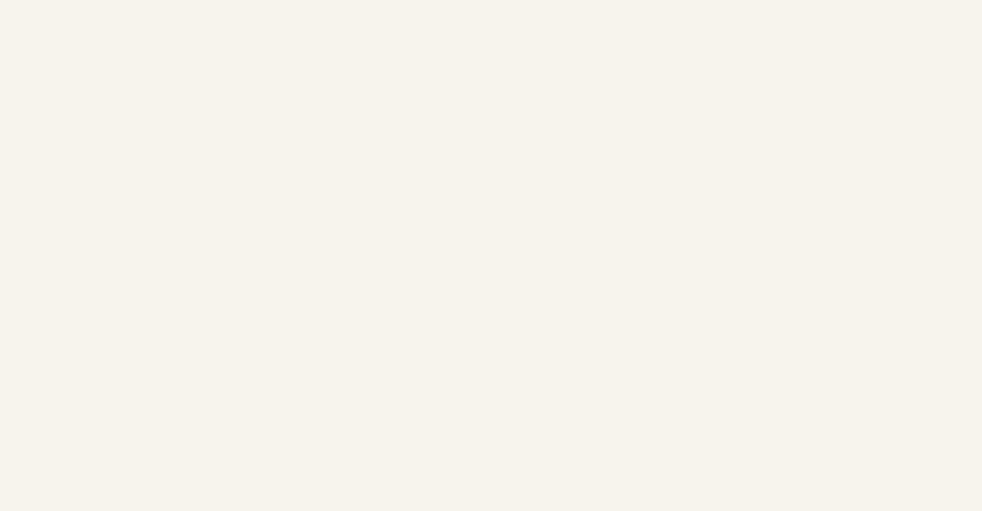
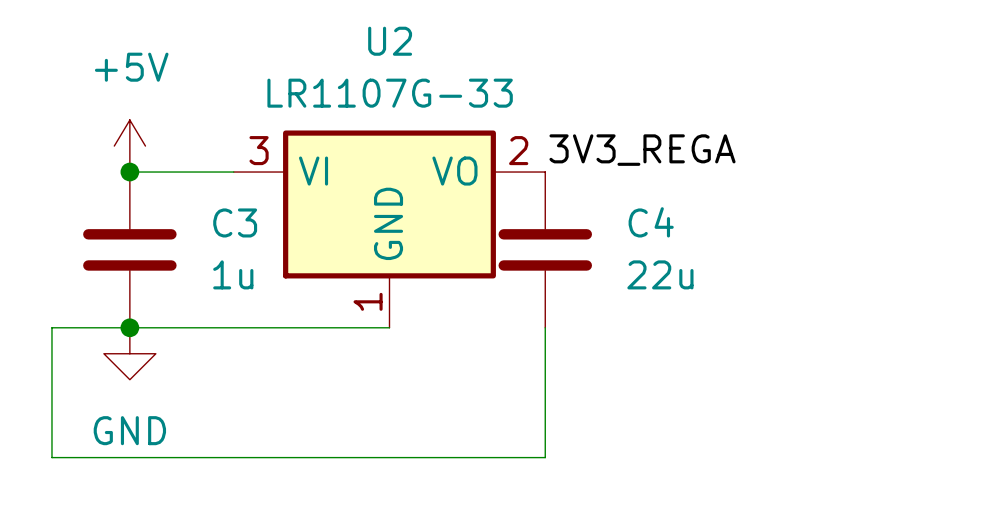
power symbol: none -> +5V (129, 146)
label: none -> 3V3_REGA (642, 150)
wire: none -> (129, 172) (233, 172)
junction: none -> (129, 172)
U2: none -> LR1107G-33 (389, 229)
C3: none -> 1u (129, 249)
C4: none -> 22u (545, 249)
junction: none -> (129, 327)
wire: none -> (389, 327) (51, 327) (51, 457) (545, 457) (545, 327)
power symbol: none -> GND (129, 353)

